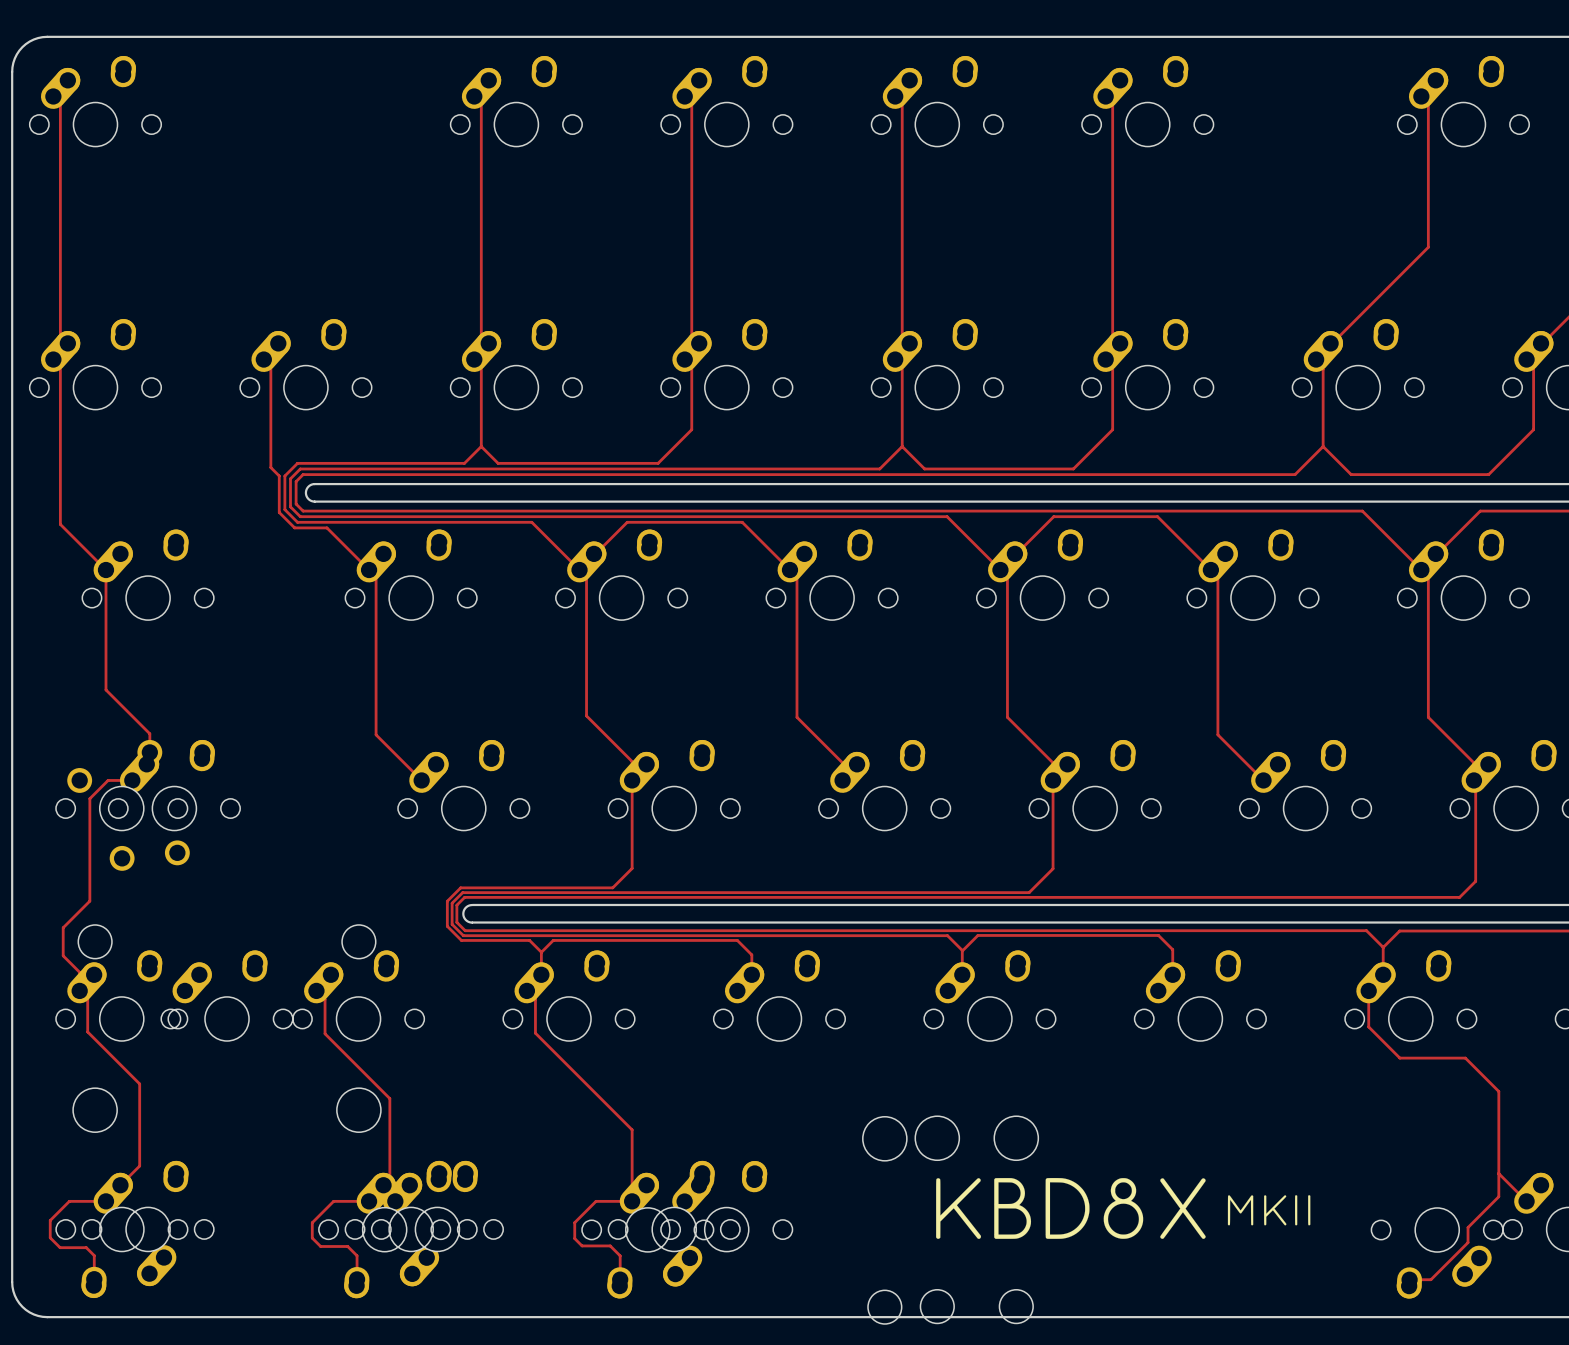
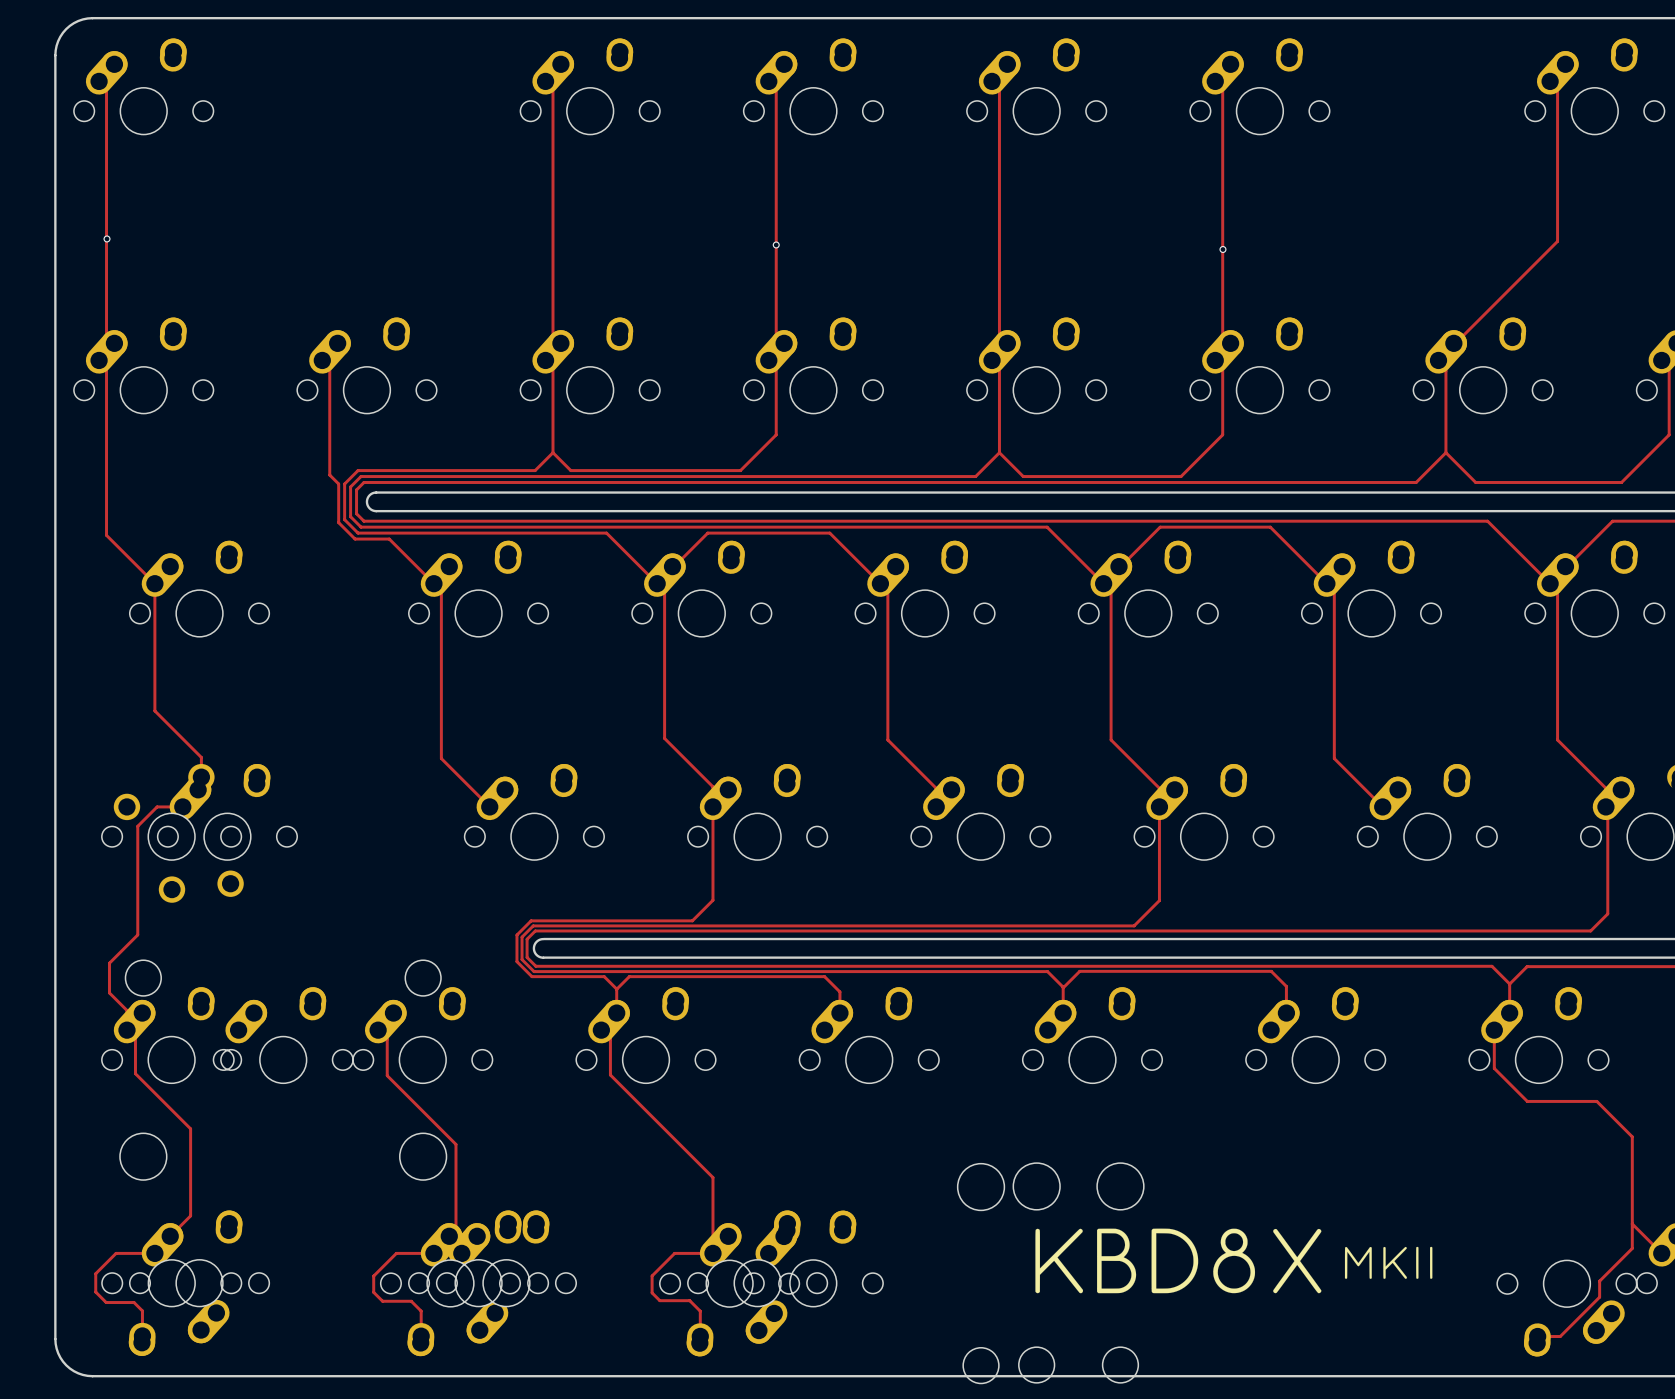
via: none -> (107, 238)
via: none -> (776, 244)
via: none -> (1222, 249)

